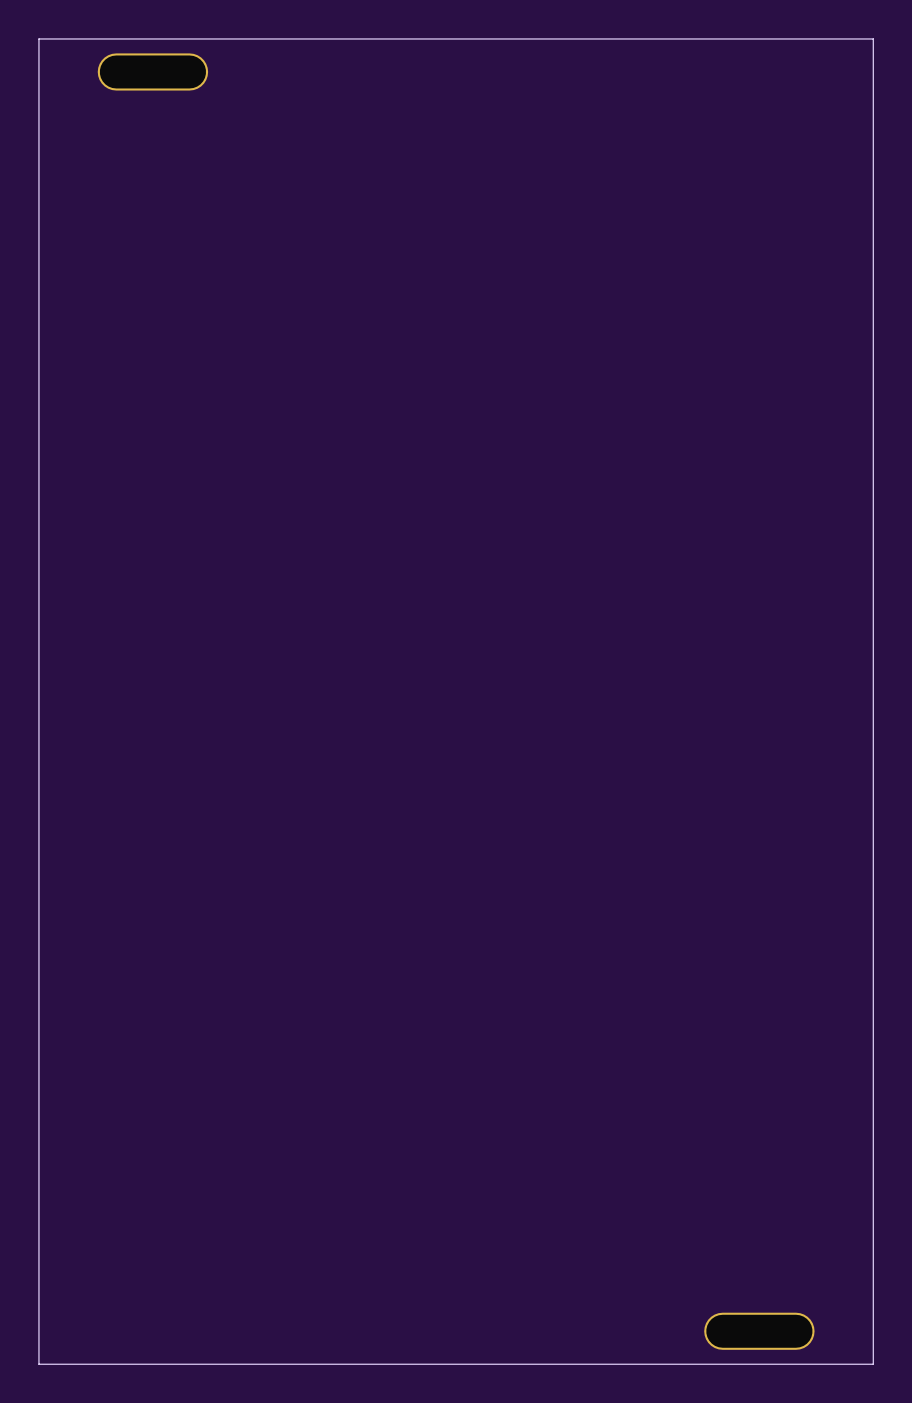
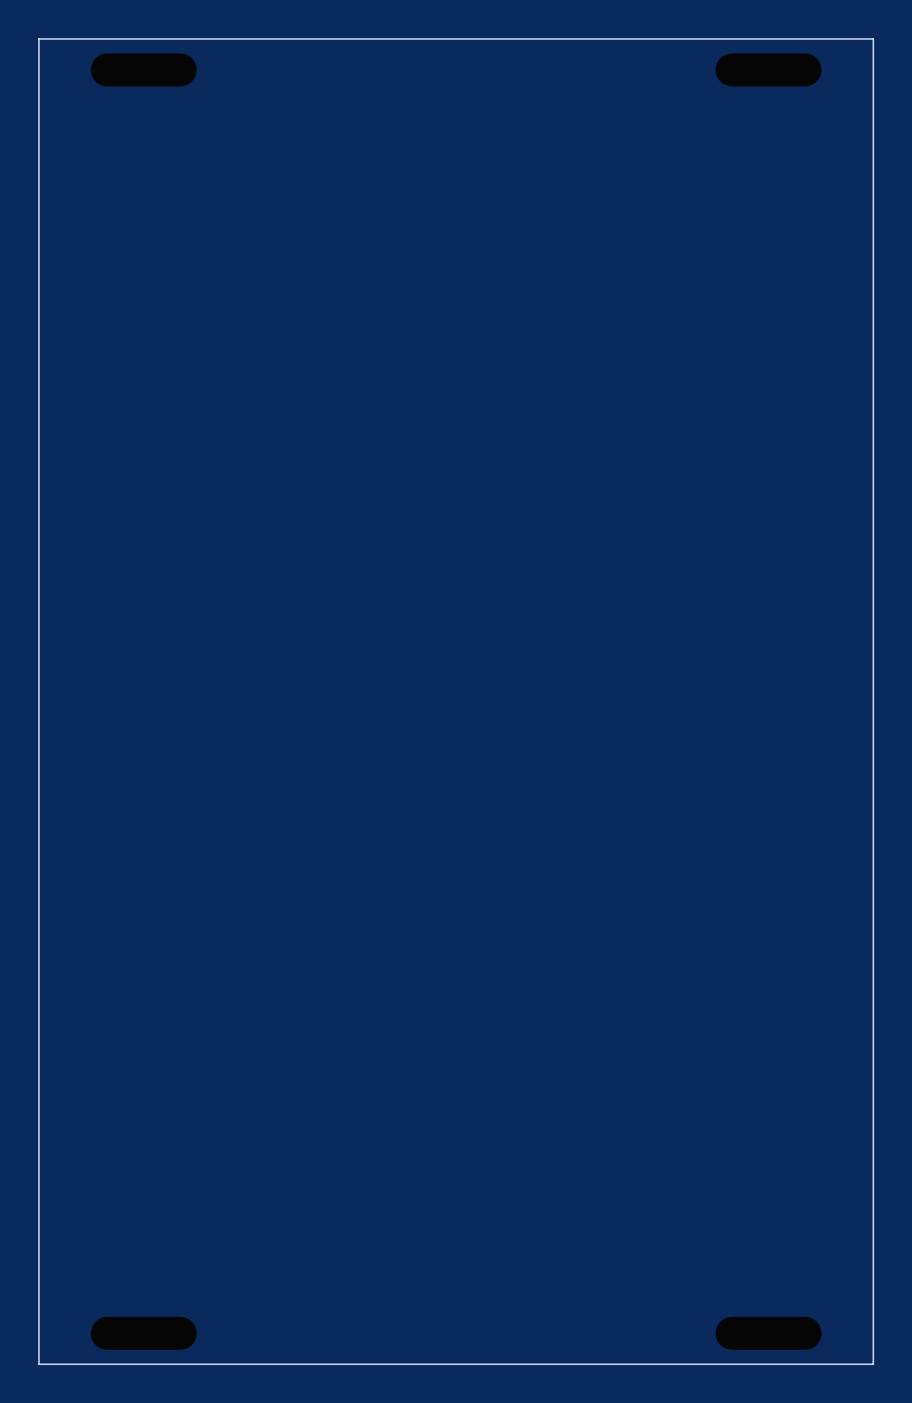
part footprint: [97, 53, 209, 91] -> [90, 53, 197, 87]
part: none -> (768, 69)
part footprint: [704, 1312, 815, 1350] -> [715, 1316, 822, 1350]
part: none -> (143, 1333)

